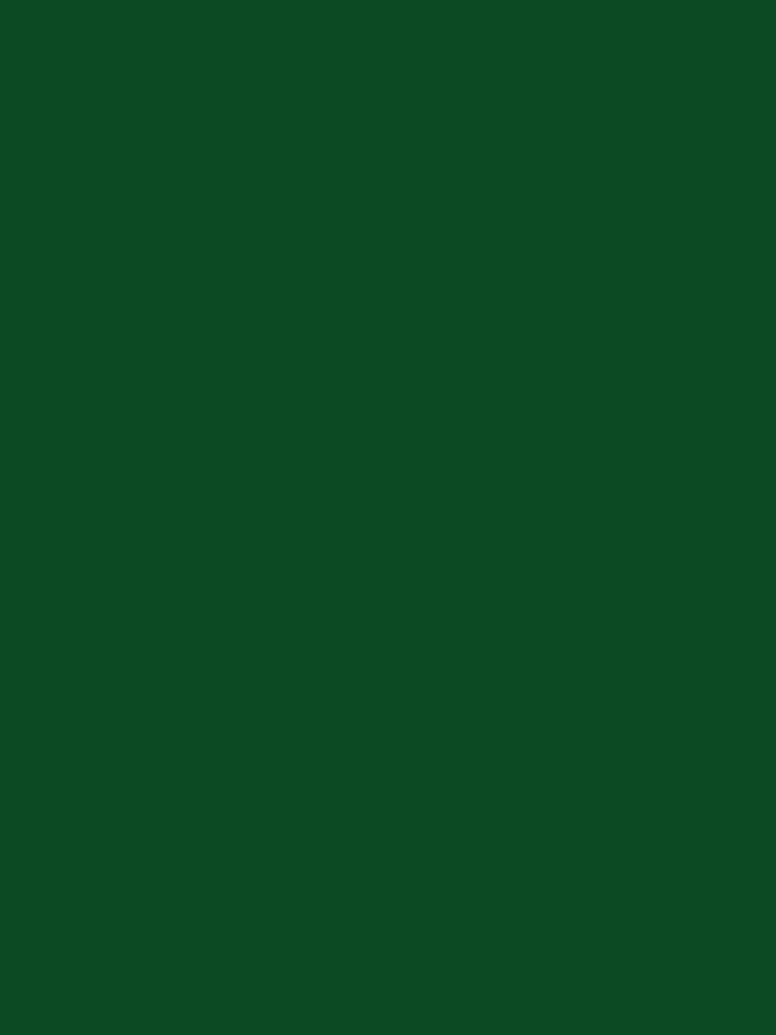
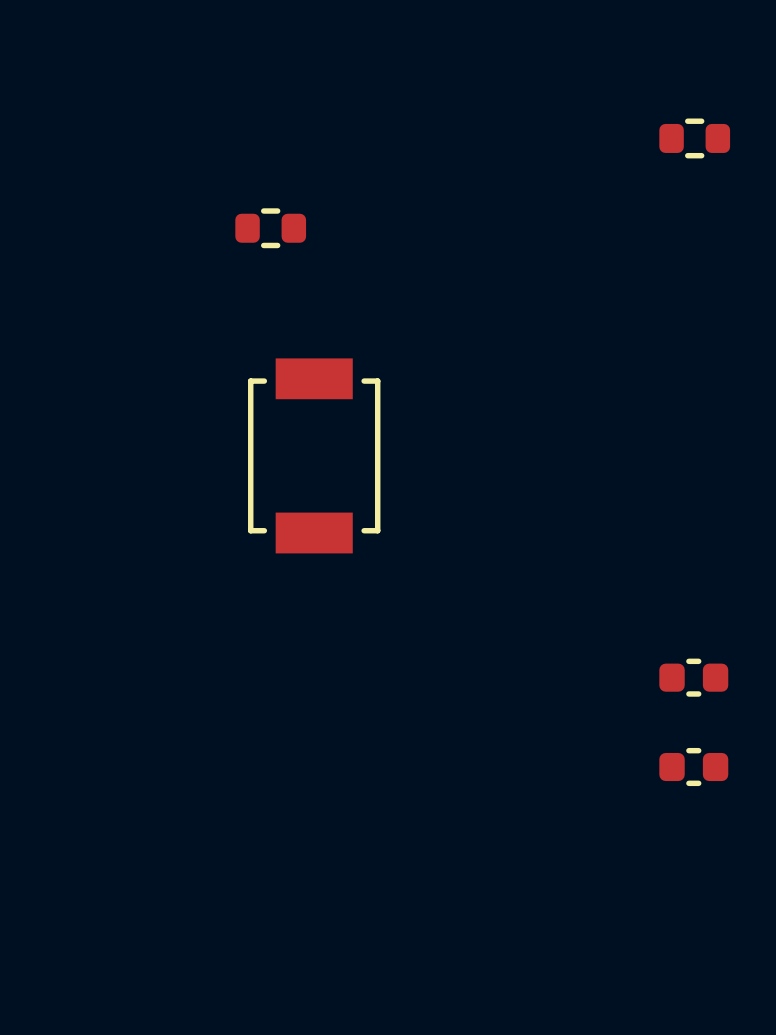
part: none -> (694, 138)
part: none -> (270, 228)
part: none -> (314, 455)
part: none -> (693, 677)
part: none -> (693, 767)

